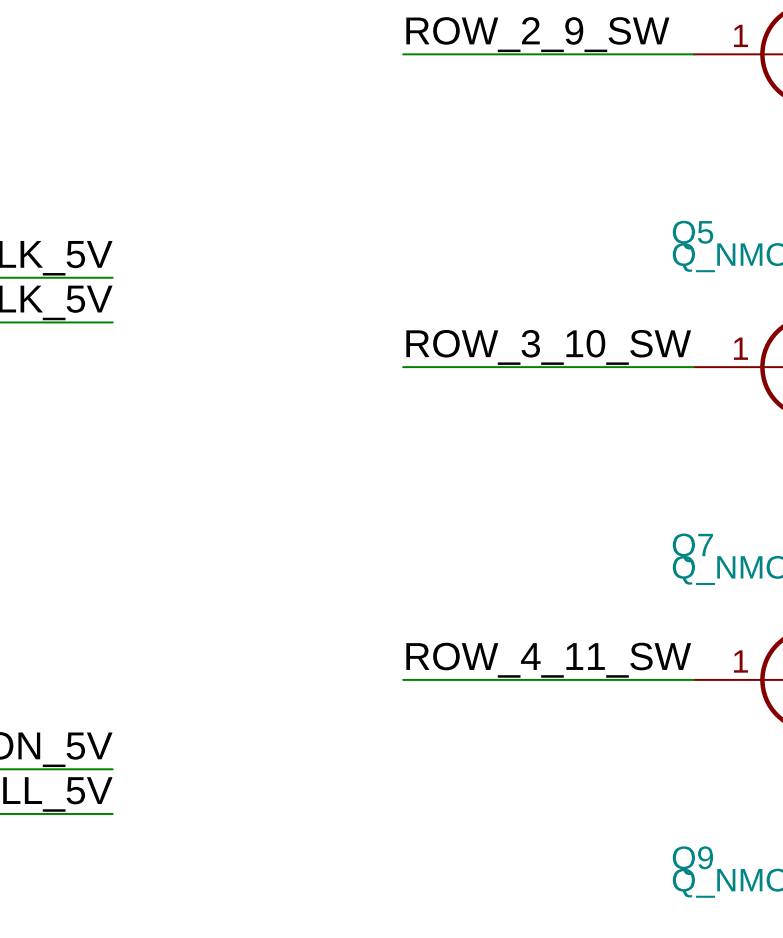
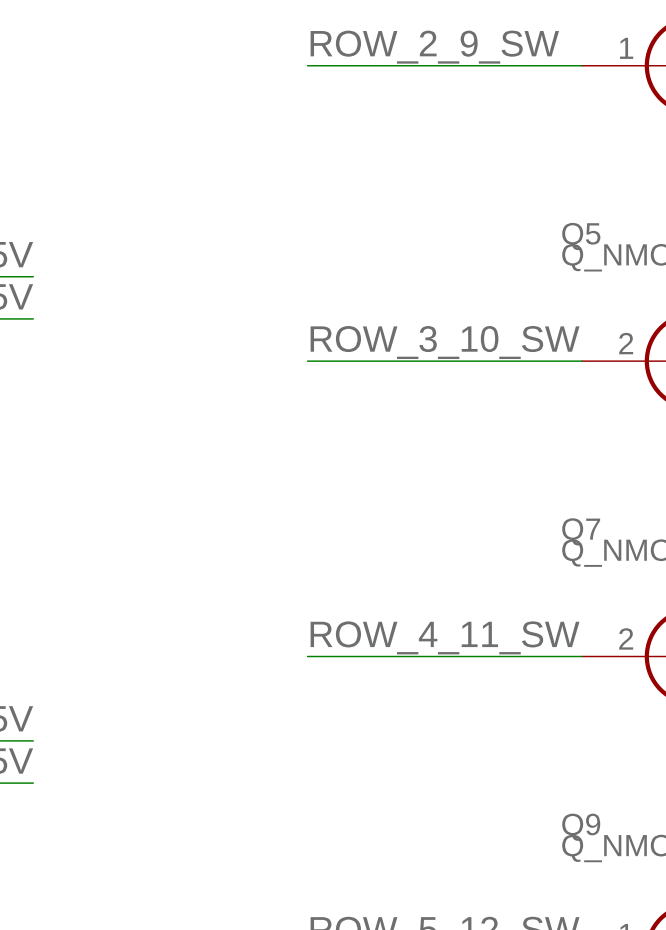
Q5 pin number: 1 (740, 348) -> 2 (626, 343)
Q7 pin number: 1 (740, 661) -> 2 (626, 638)

